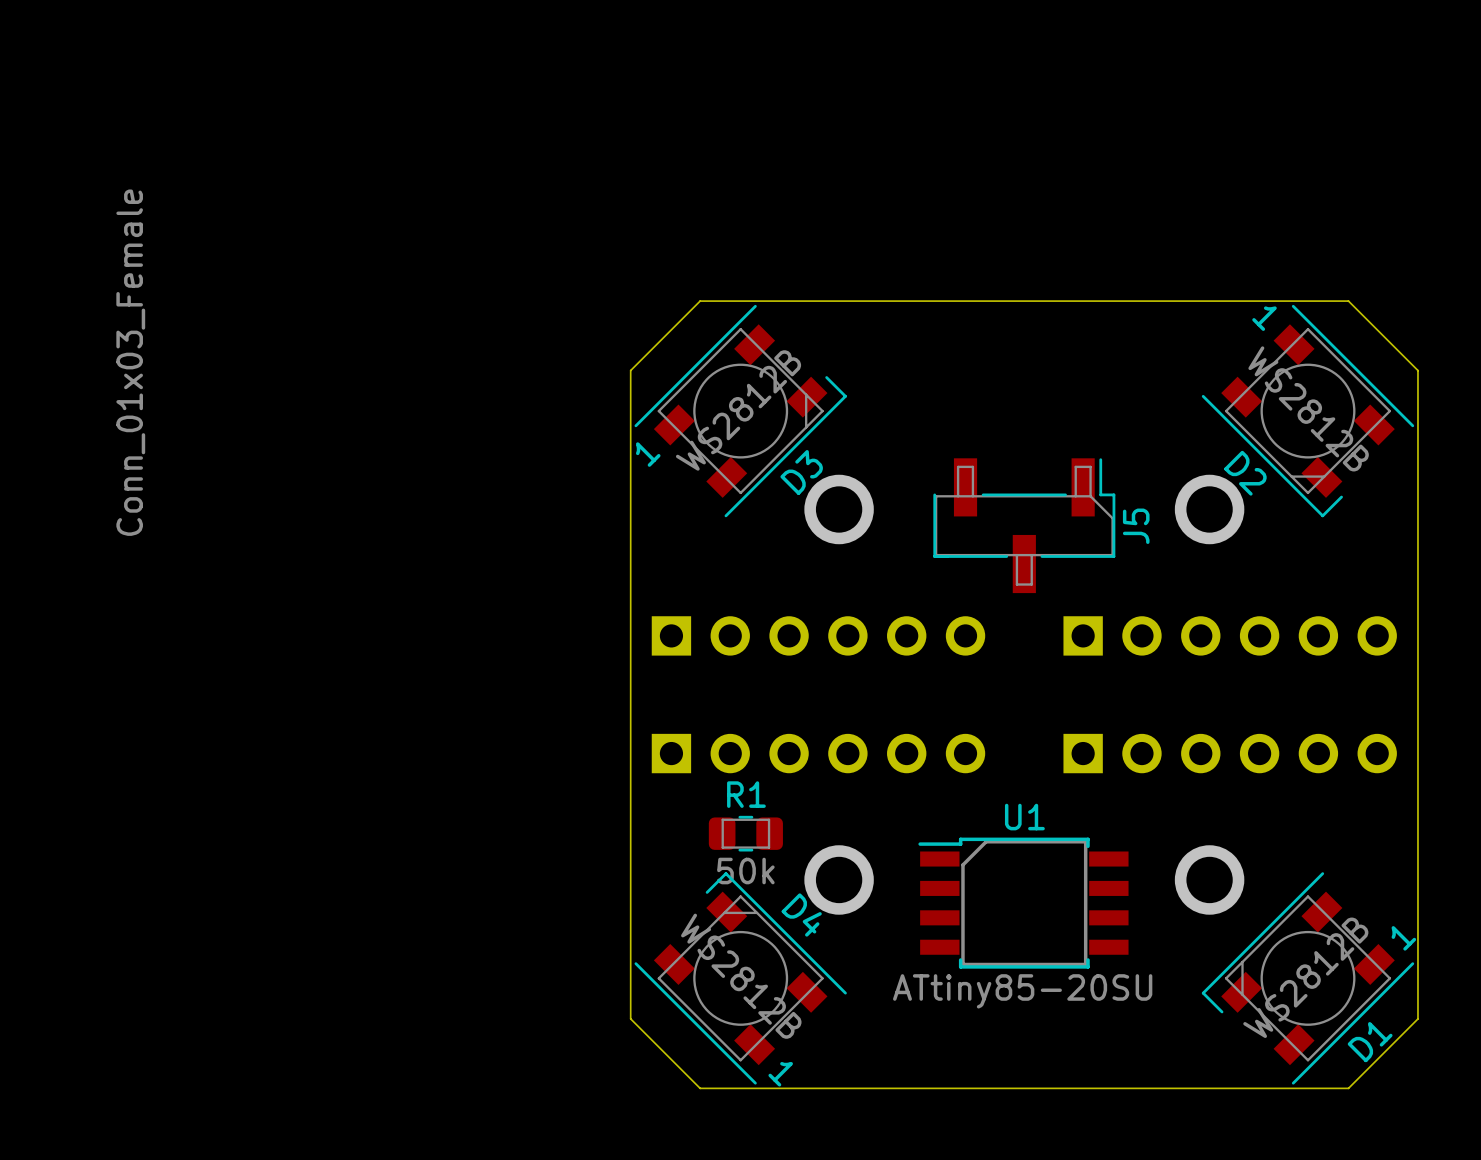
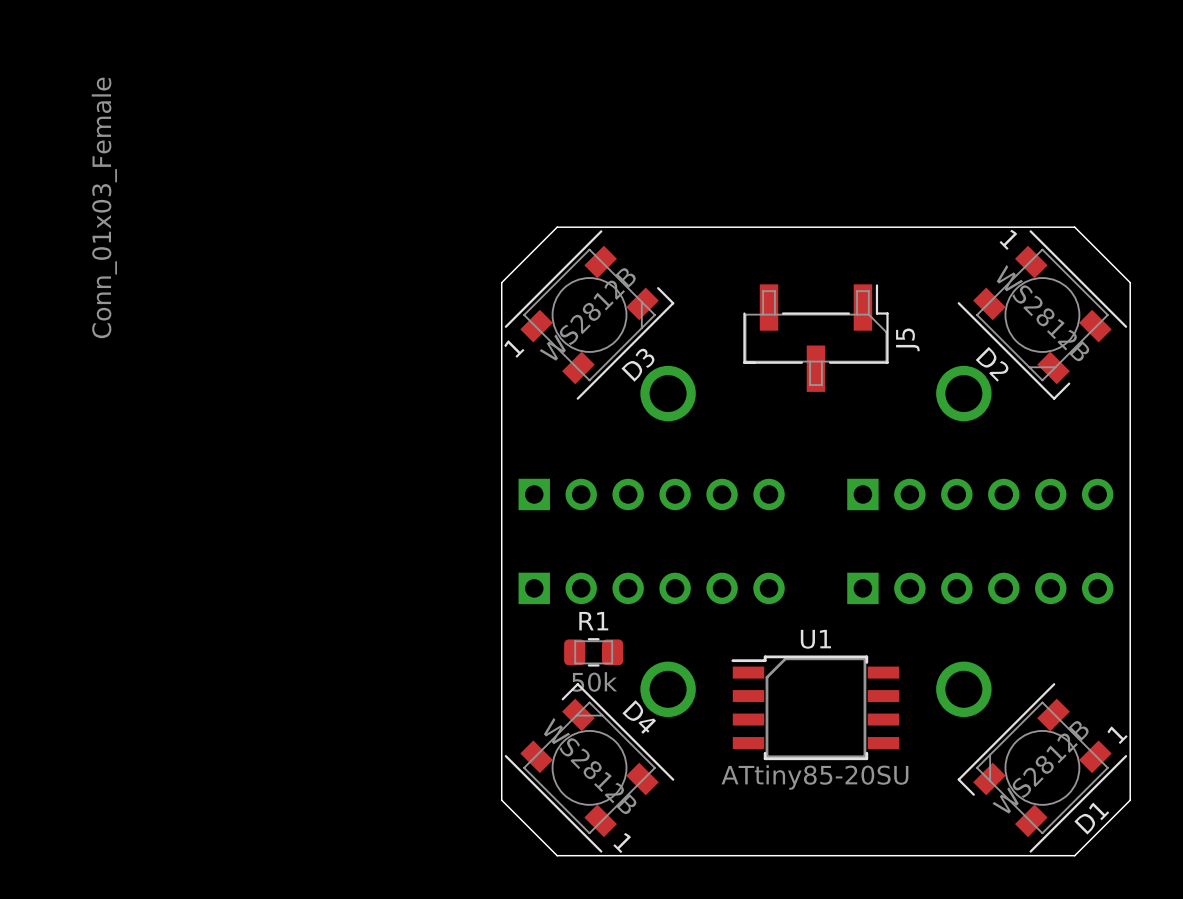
J5 position: (1024, 525) -> (815, 338)

